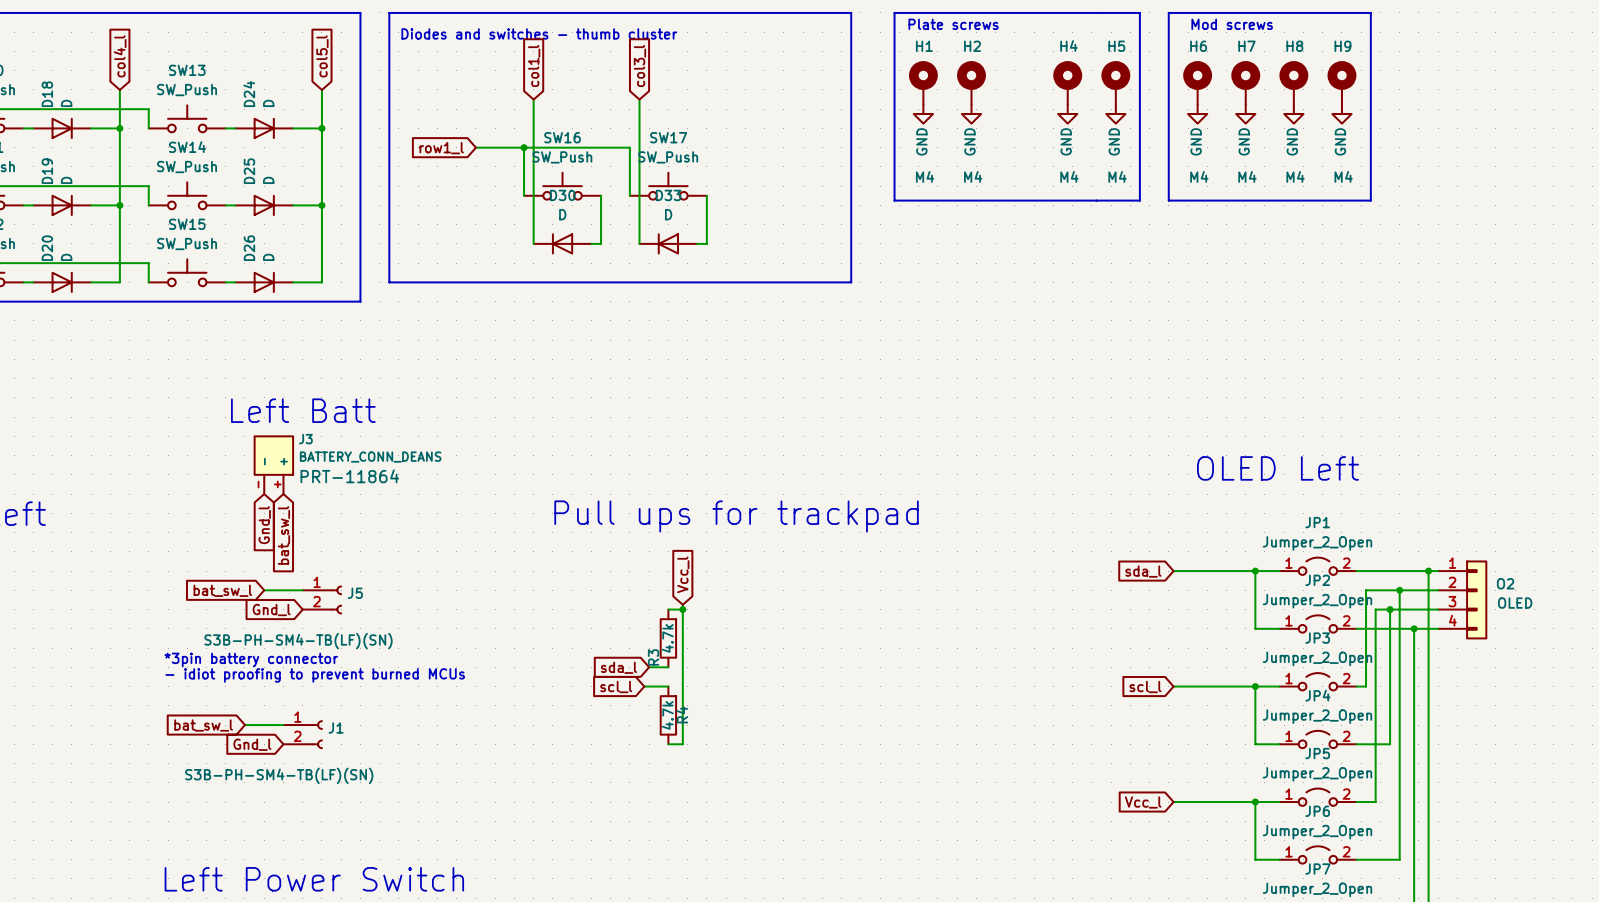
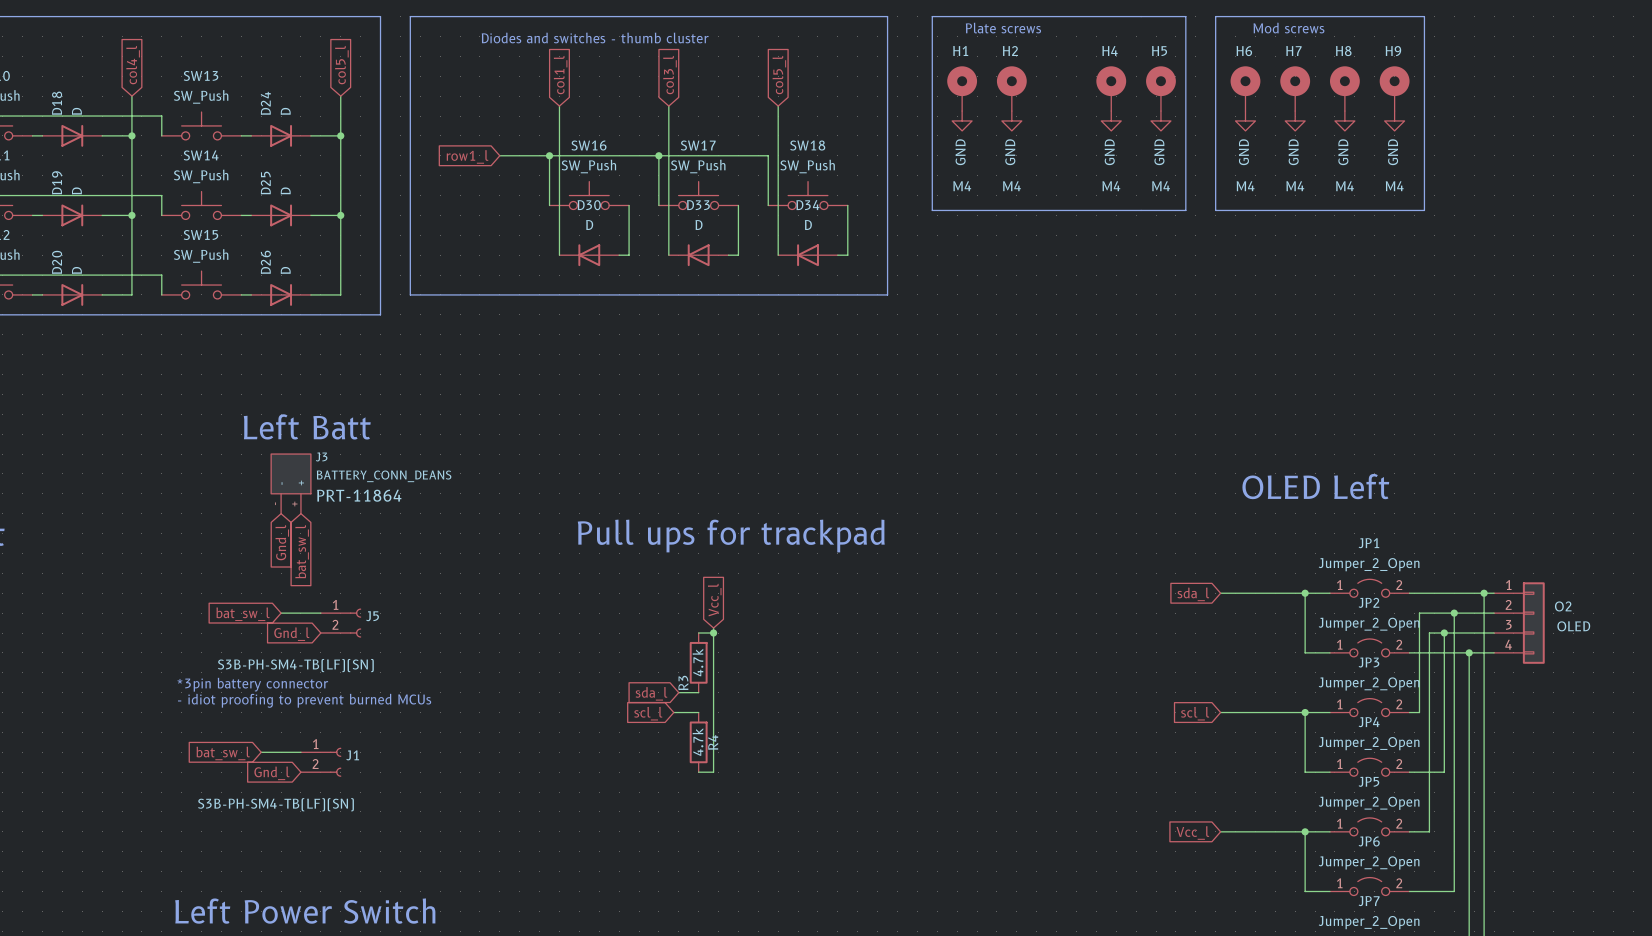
global label: none -> col5_l (779, 75)
wire: none -> (778, 106) (778, 255)
wire: none -> (658, 155) (768, 155) (768, 205)
junction: none -> (658, 155)
SW18: none -> SW_Push (808, 195)
wire: none -> (847, 205) (847, 255) (837, 255)
D34: none -> D (808, 255)

